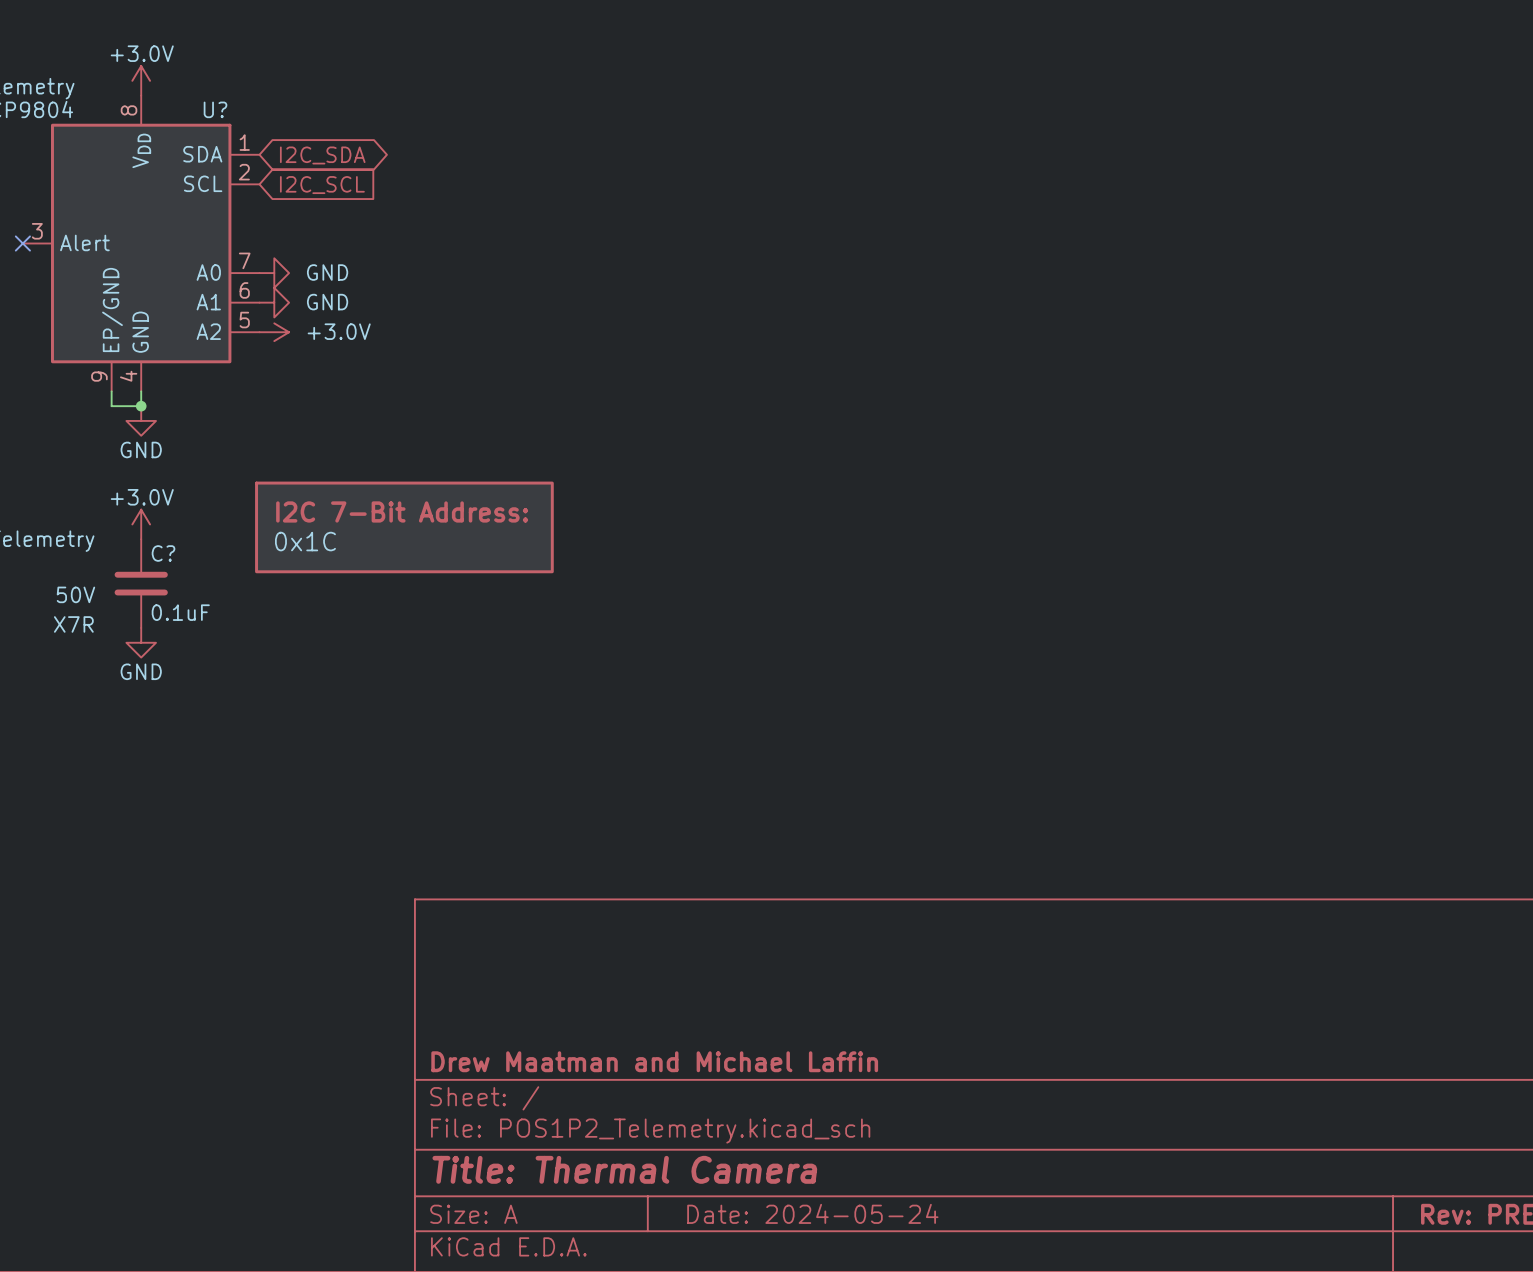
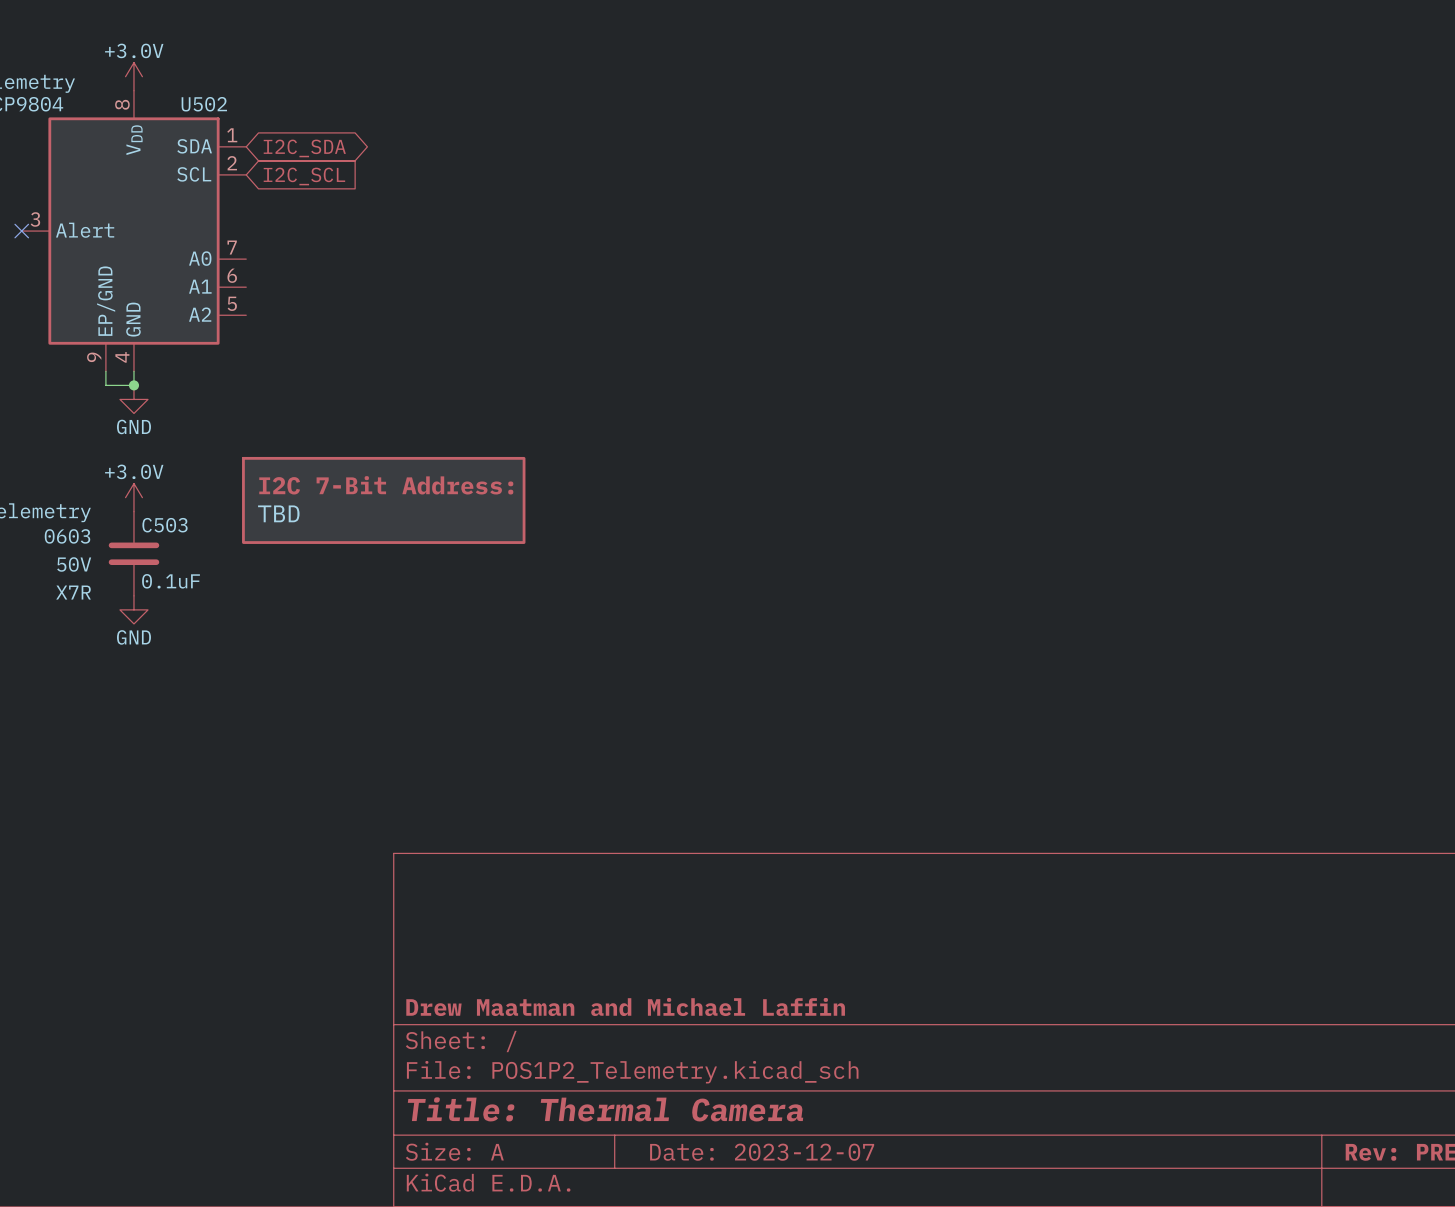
U? name: U? (215, 109) -> U502 (204, 104)
power symbol: GND (274, 273) -> none
power symbol: GND (274, 302) -> none
power symbol: +3.0V (274, 332) -> none
part value: 0x1C (305, 541) -> TBD (278, 513)
C? name: C? (163, 553) -> C503 (165, 525)
C? text: none -> 0603 (67, 536)
title block: Date: 2024-05-24 (812, 1213) -> Date: 2023-12-07 (762, 1152)

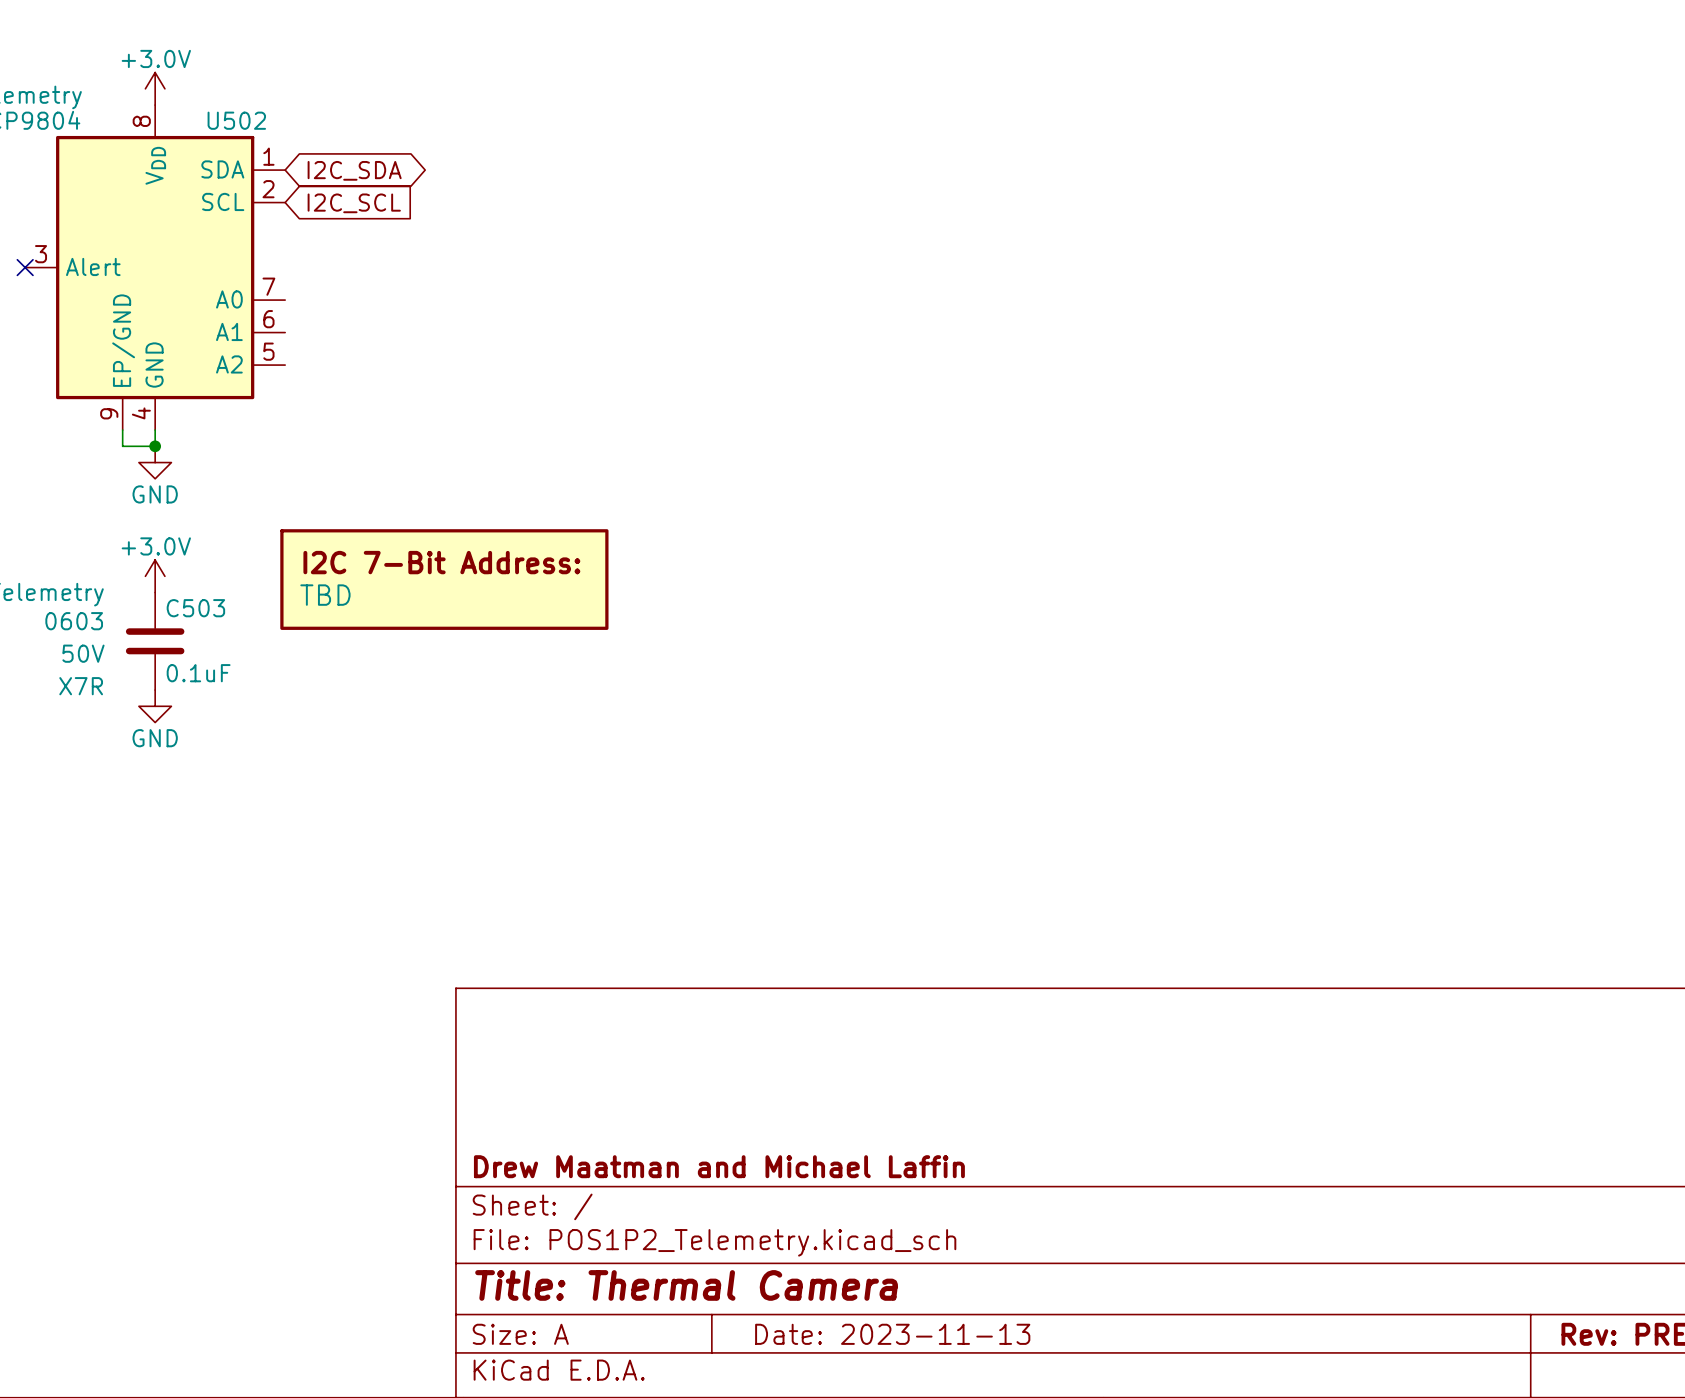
title block: Date: 2023-12-07 (762, 1152) -> Date: 2023-11-13 (892, 1334)

